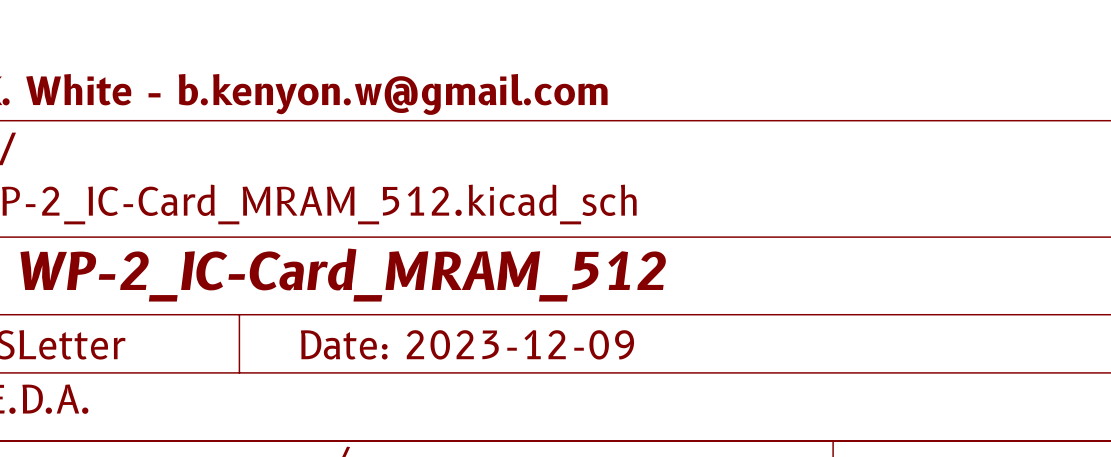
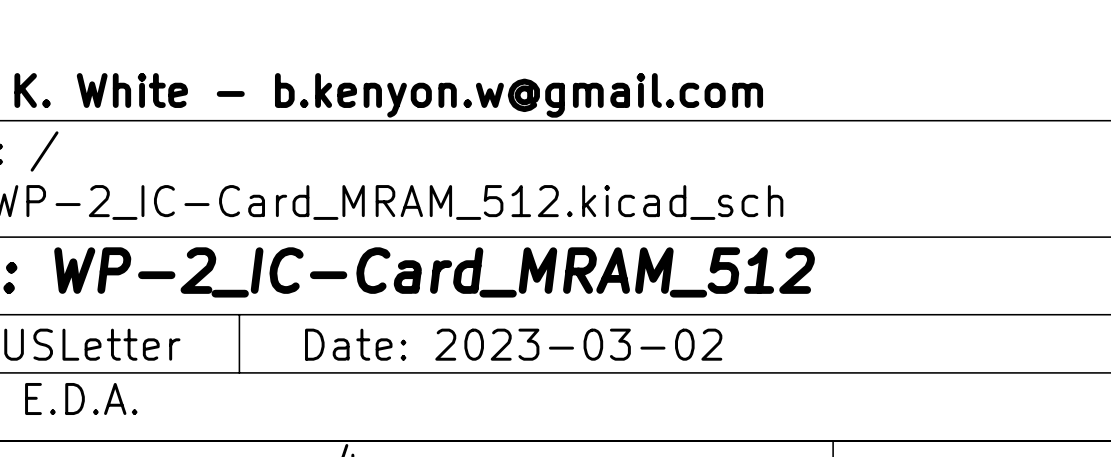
title block: Date: 2023-12-09 (467, 344) -> Date: 2023-03-02 (513, 344)

